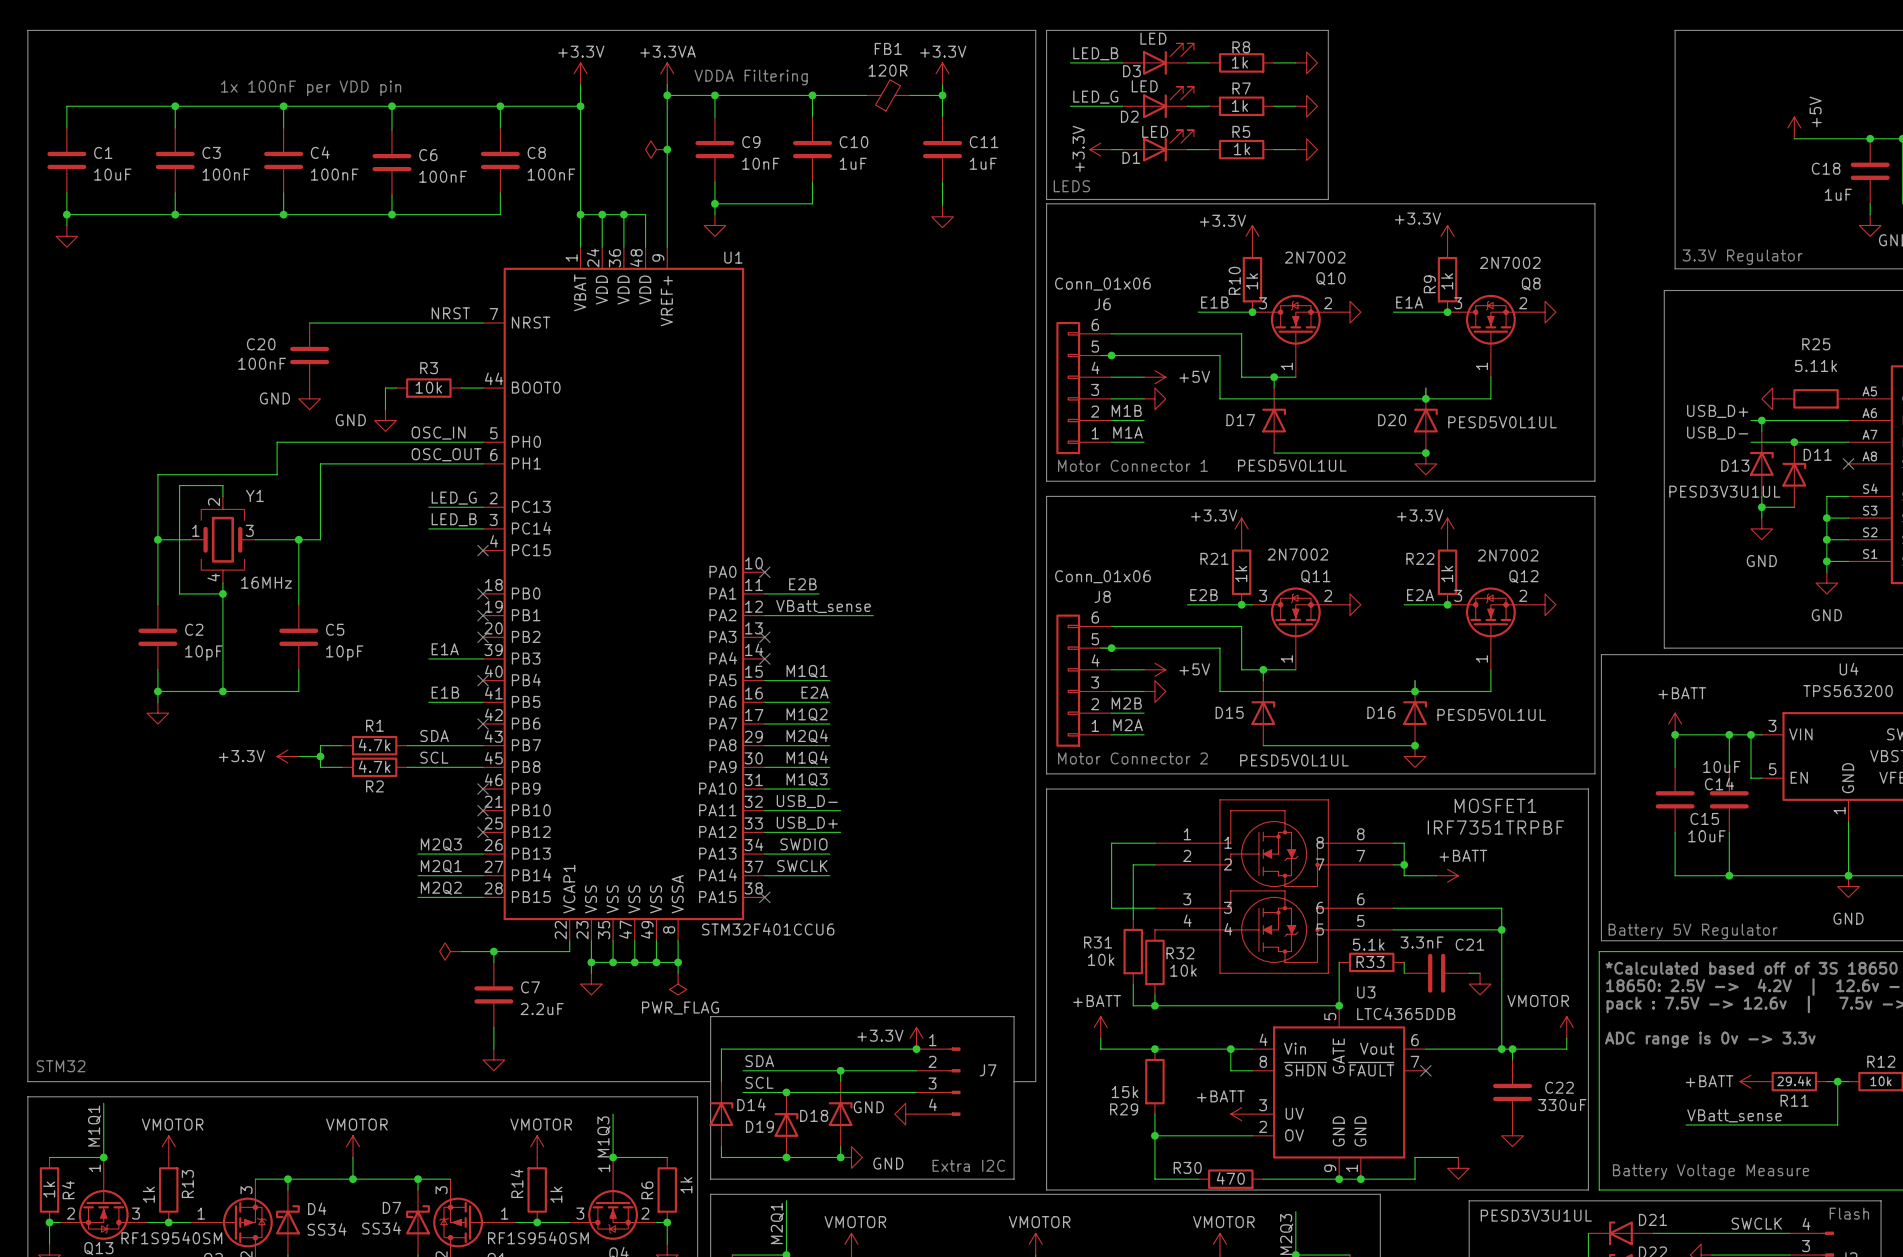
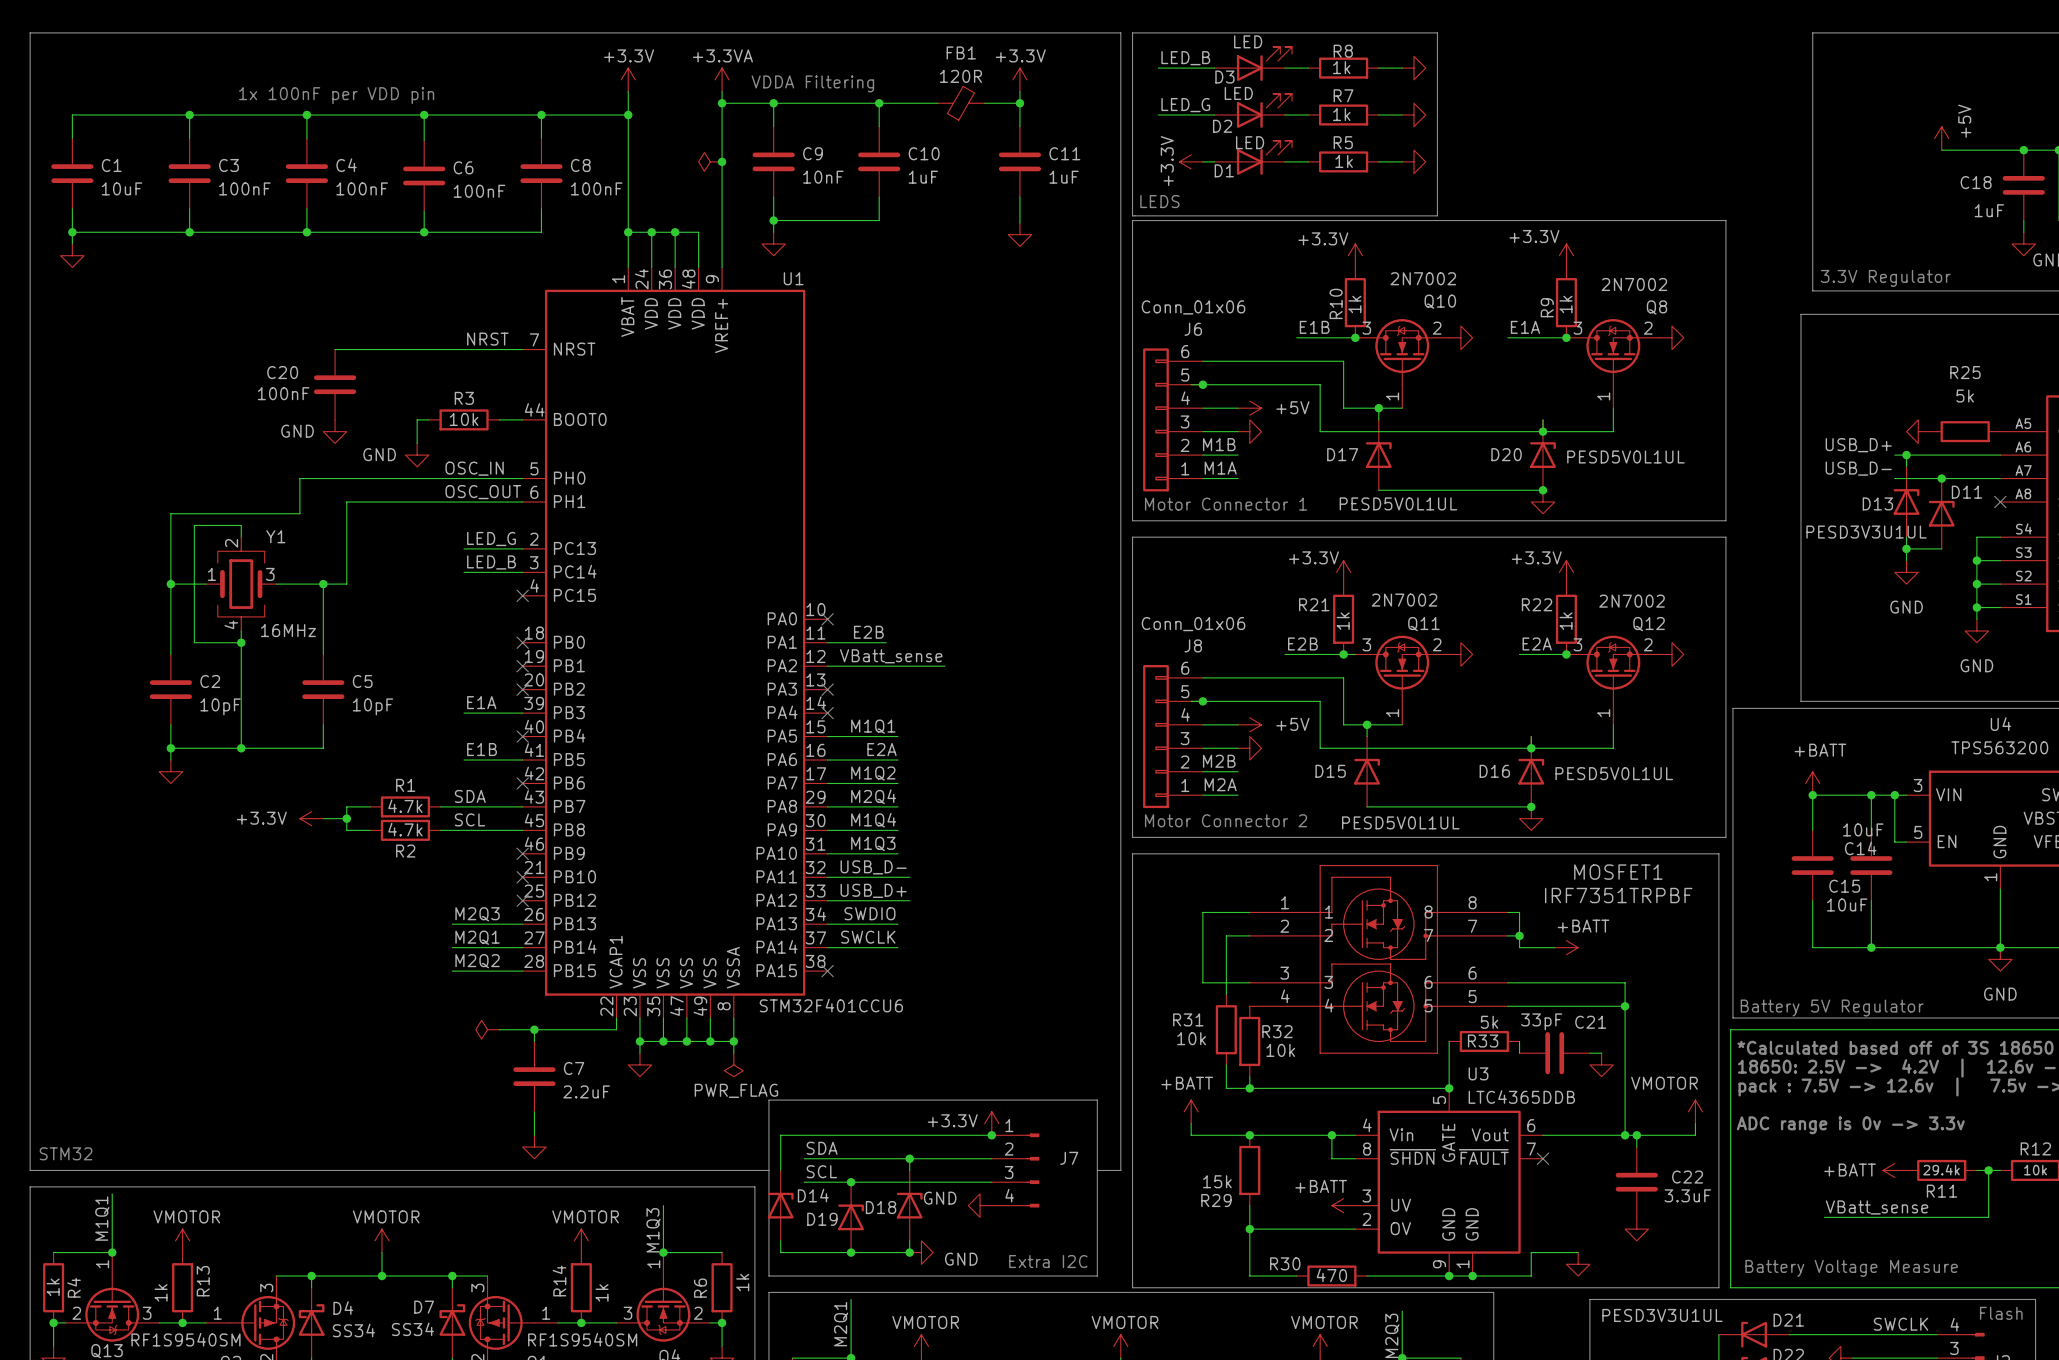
R25 value: 5.11k (1816, 365) -> 5k (1965, 396)
C21 value: 3.3nF (1422, 942) -> 33pF (1541, 1021)
R33 value: 5.1k (1368, 944) -> 5k (1489, 1022)
C22 value: 330uF (1562, 1105) -> 3.3uF (1687, 1195)

